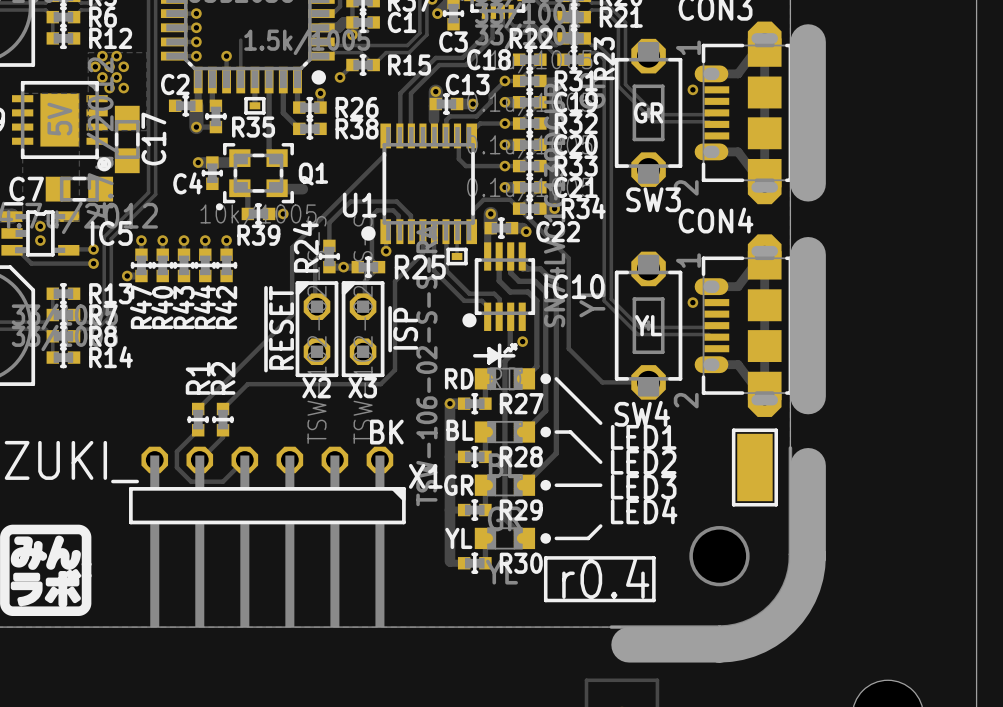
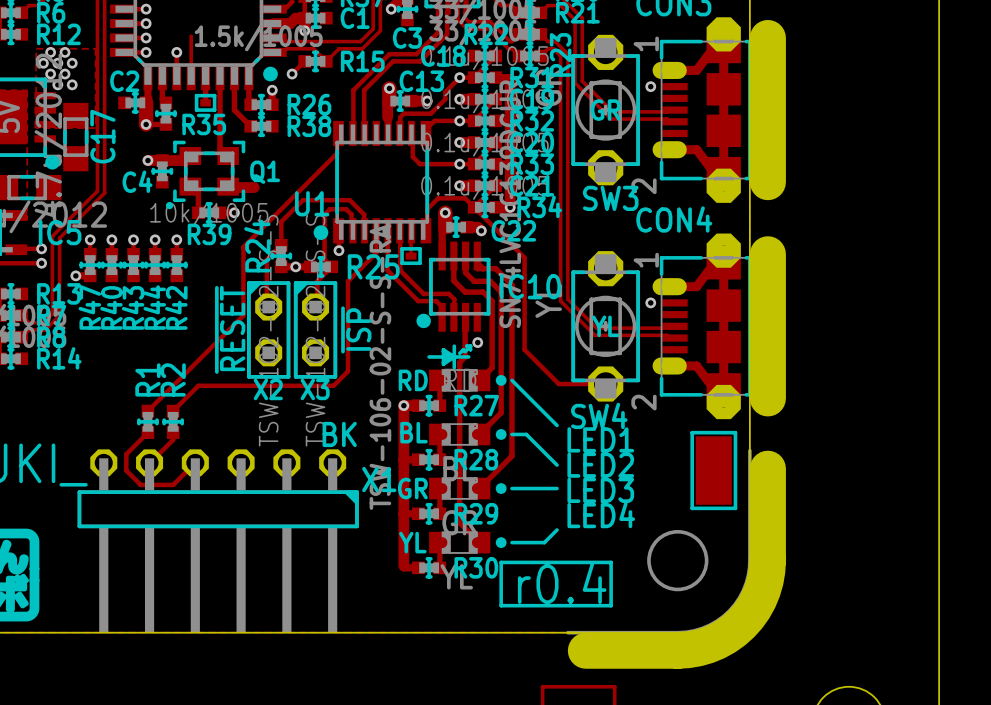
drawing: none -> [575, 79, 637, 141]
drawing: none -> [575, 295, 637, 357]

